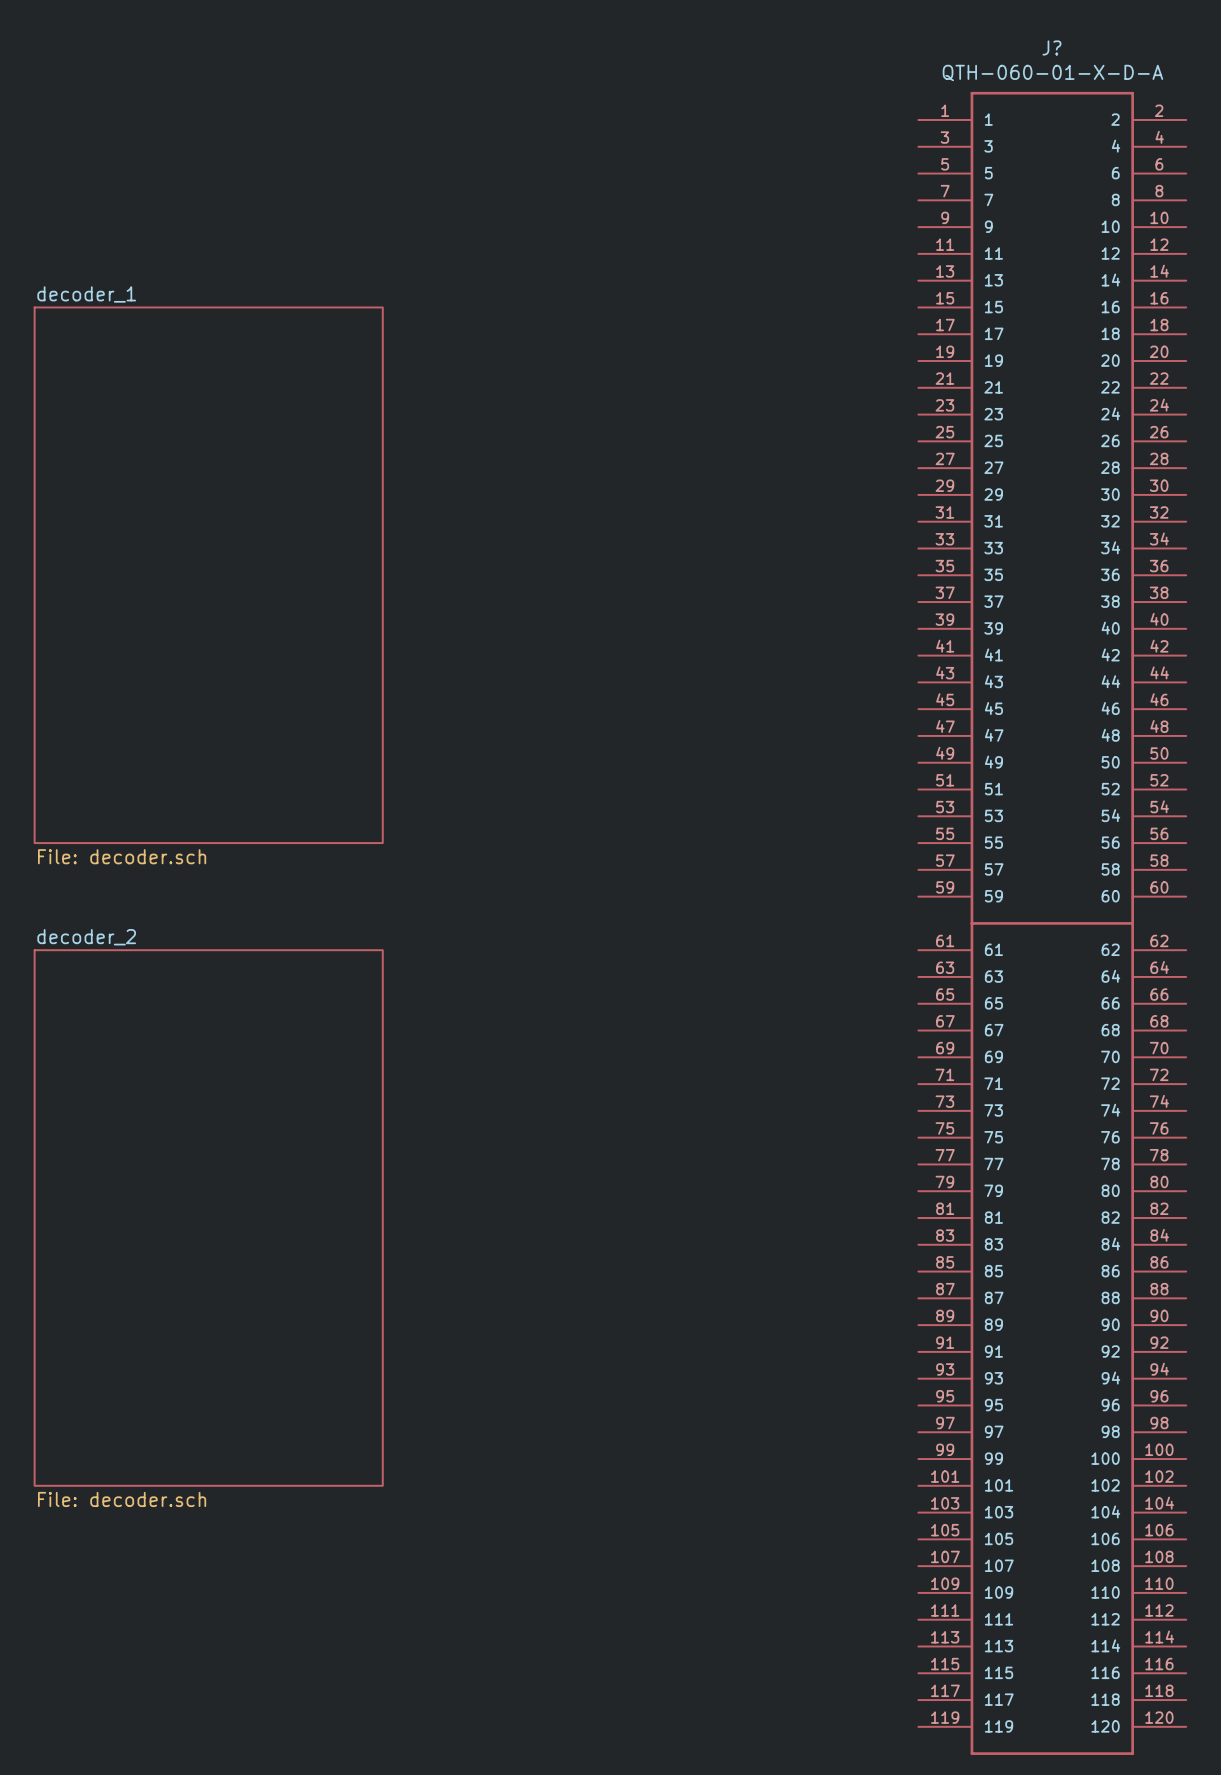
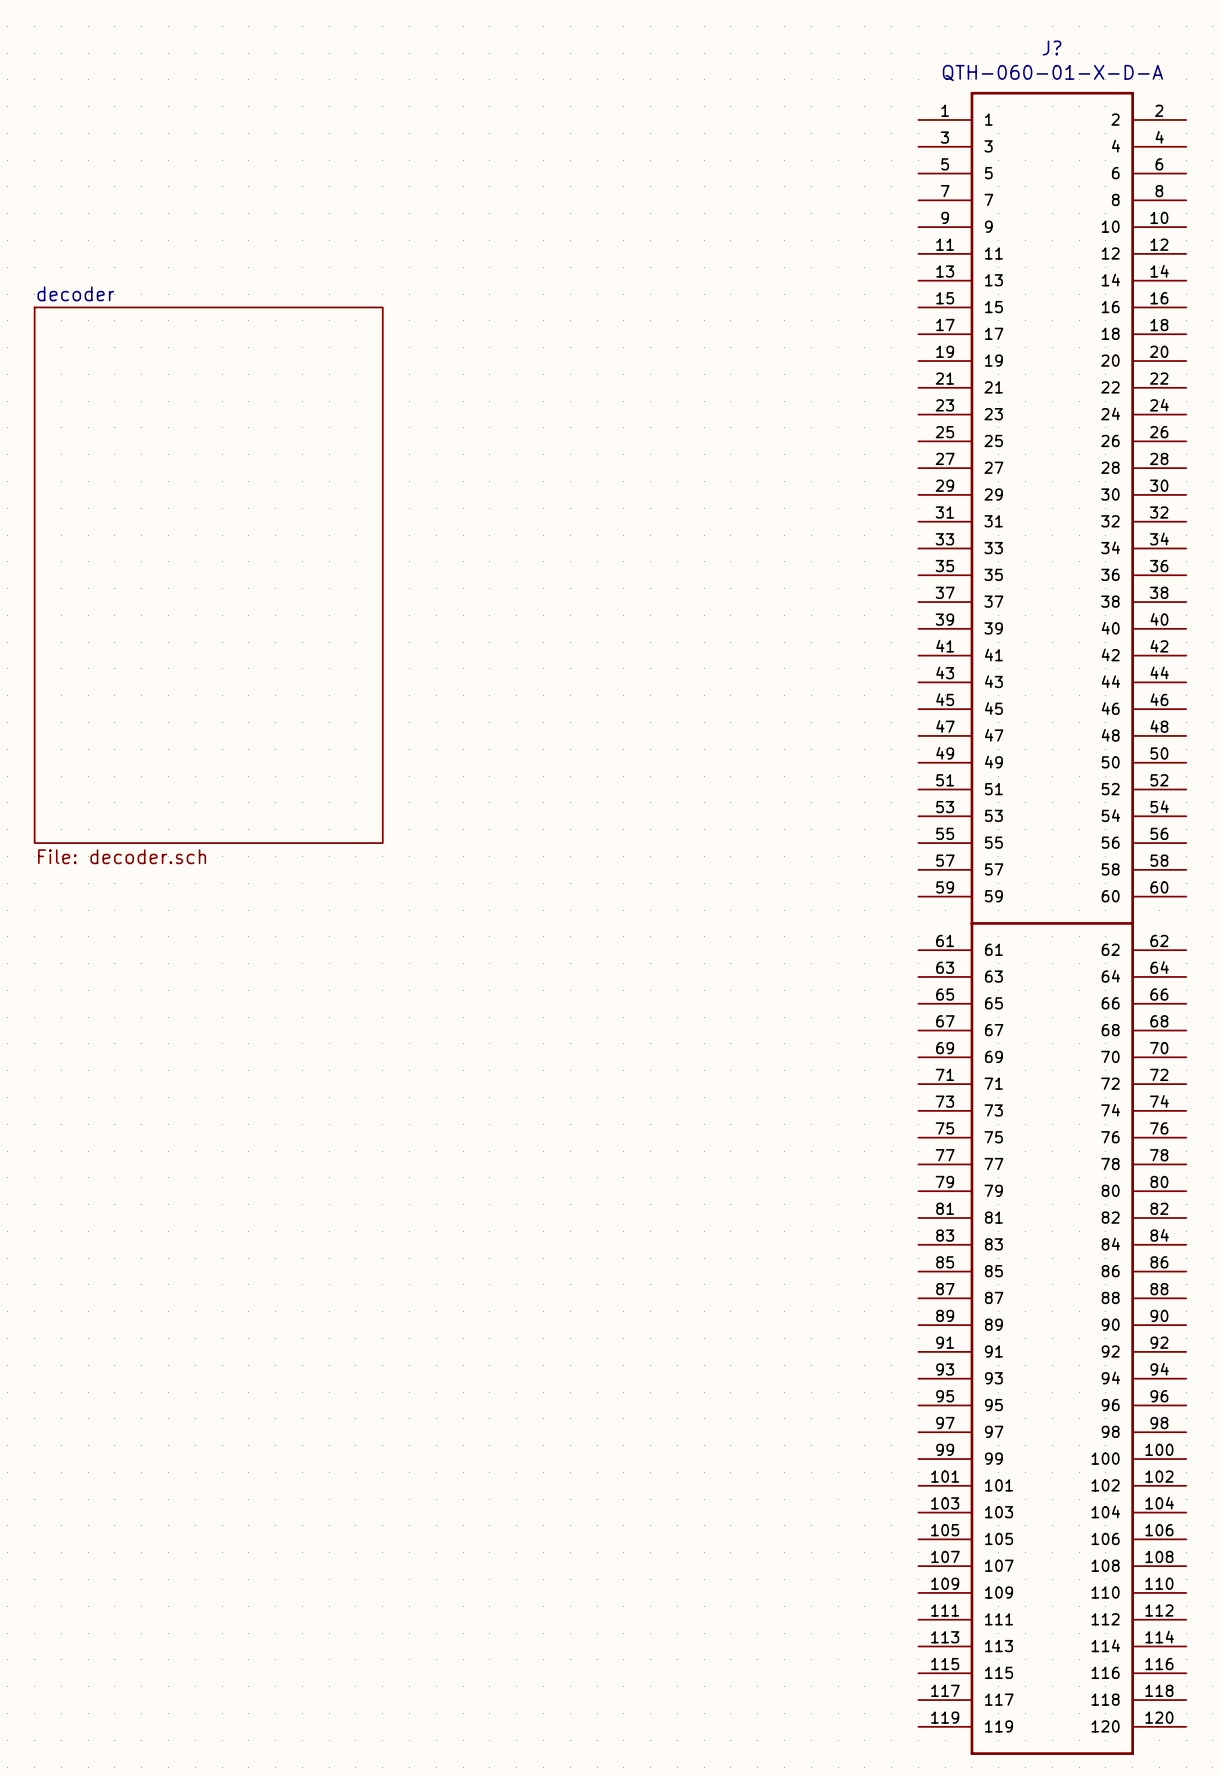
sheet decoder_1 name: decoder_1 (86, 294) -> decoder (75, 293)
sheet decoder_2: File: decoder.sch (208, 1217) -> none

